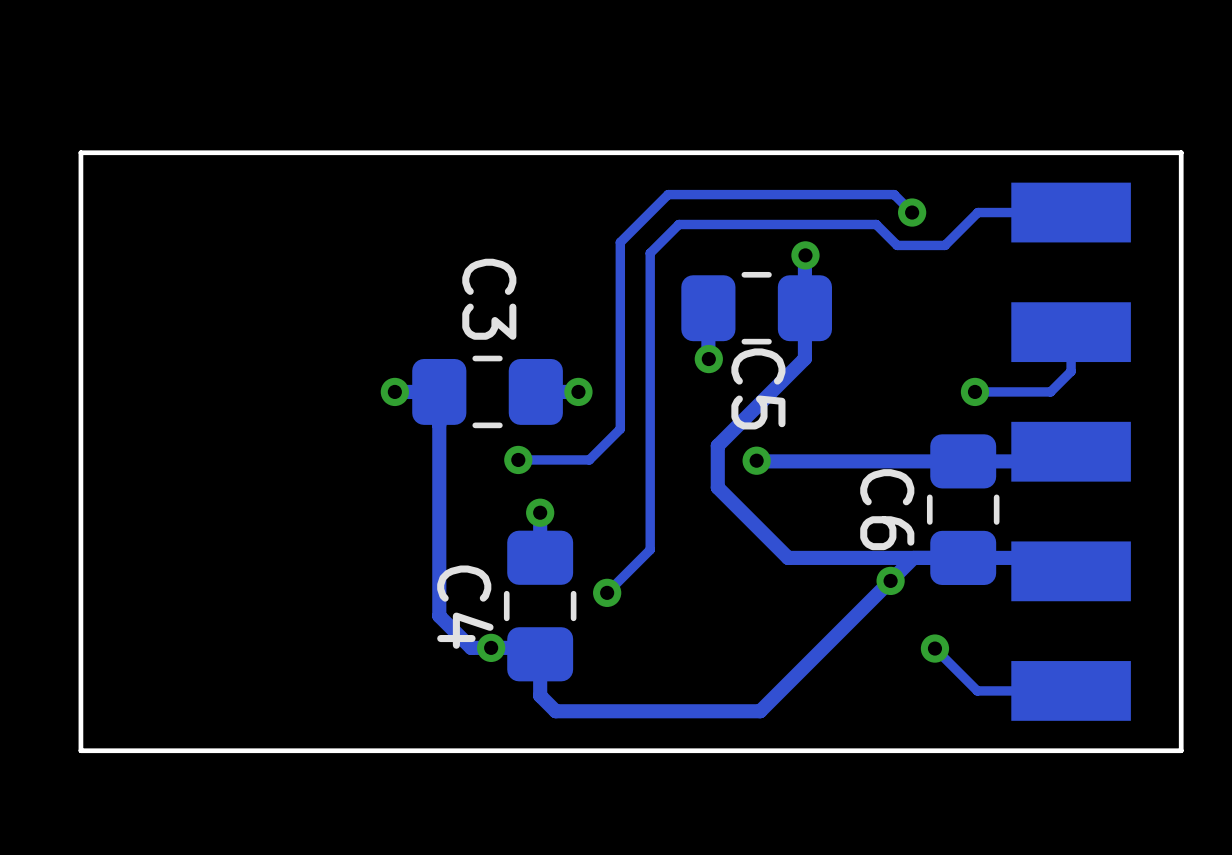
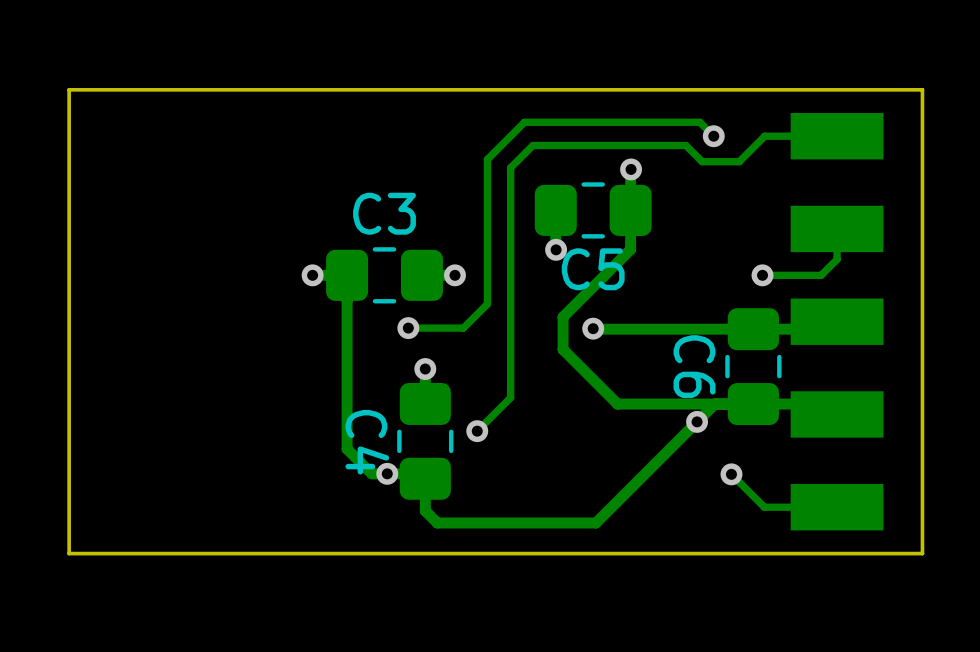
C3 name rotation: 0° (489, 299) -> 90° counterclockwise (384, 213)
C5 name rotation: 0° (758, 388) -> 90° counterclockwise (593, 269)

